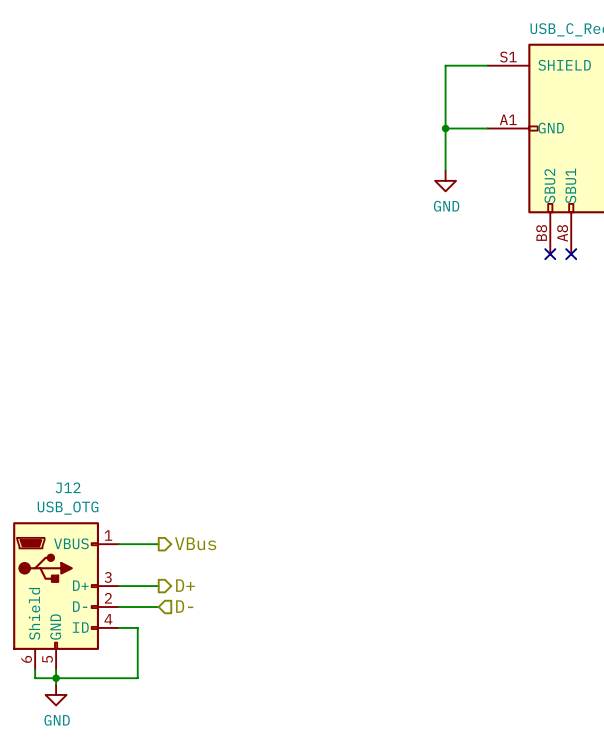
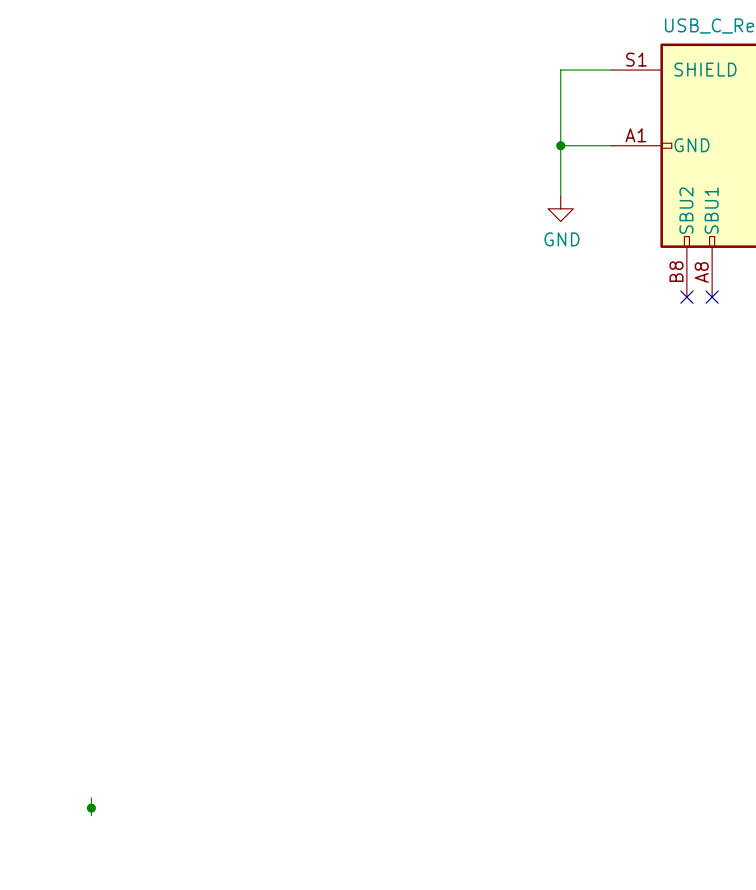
hierarchical label: VBus (195, 543) -> none
wire: (118, 544) (158, 544) -> none
hierarchical label: D+ (185, 585) -> none
wire: (118, 586) (158, 586) -> none
J12: USB_OTG (66, 596) -> none
hierarchical label: D- (184, 606) -> none
wire: (118, 607) (158, 607) -> none
wire: (118, 627) (137, 627) (137, 678) (35, 678) (35, 669) -> none
power symbol: GND (56, 694) -> none

